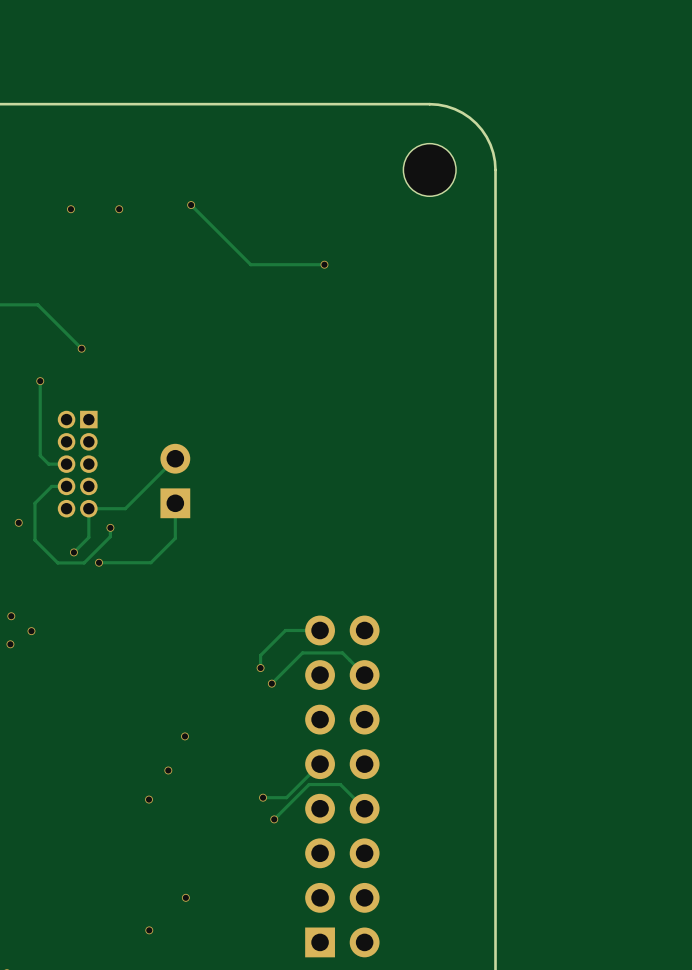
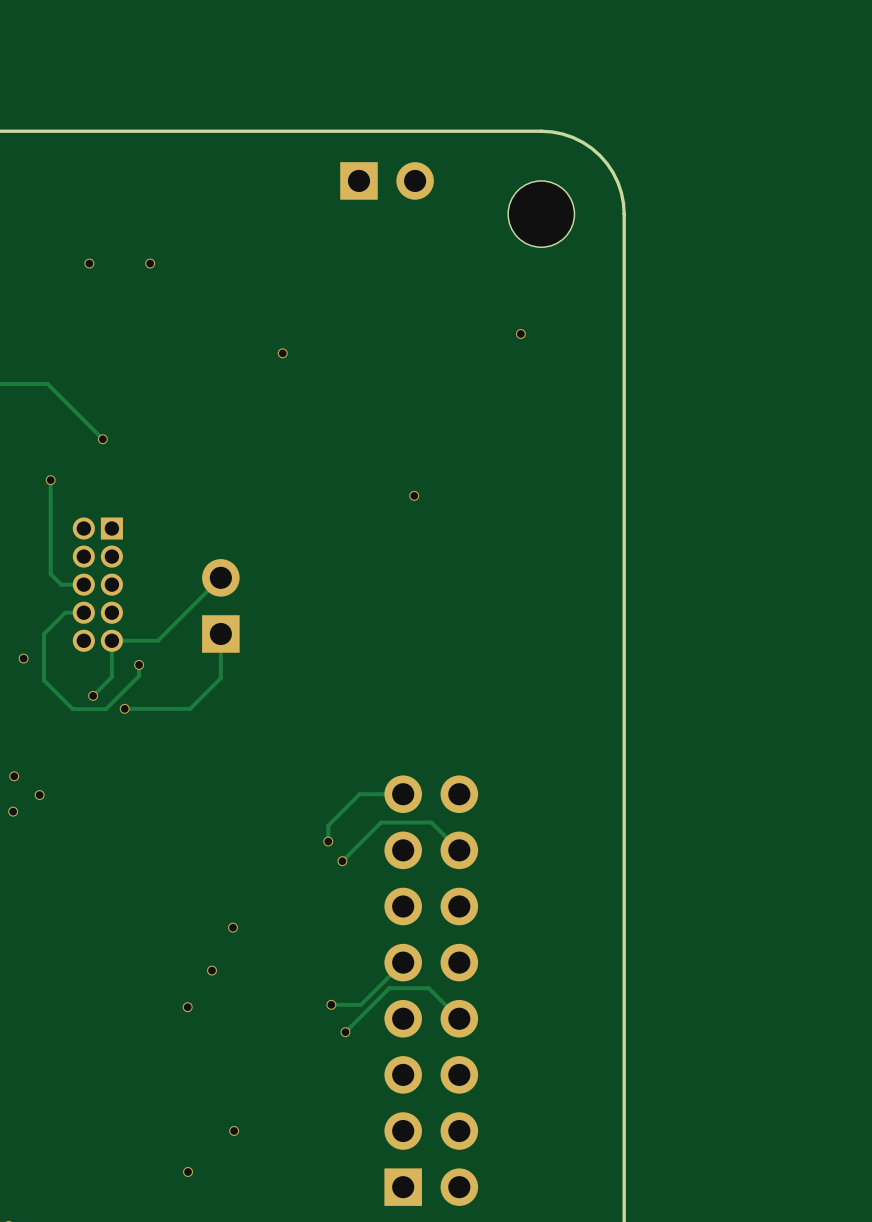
part: none -> (387, 180)
track: (191, 205) (250, 264) (324, 264) -> none
via: (191, 205) -> none
via: (324, 264) -> none
via: none -> (520, 333)
via: none -> (282, 353)
via: none -> (414, 495)

